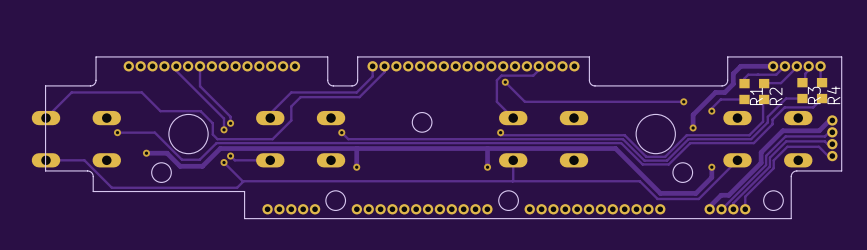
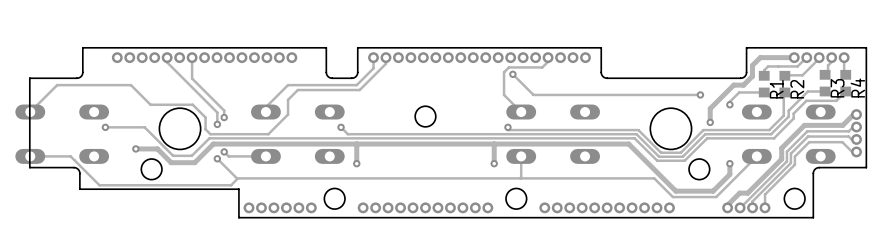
part footprint: [262, 204, 321, 215] -> [243, 202, 317, 214]
part footprint: [351, 204, 493, 215] -> [357, 202, 494, 214]
part footprint: [524, 204, 666, 215] -> [539, 202, 675, 214]

